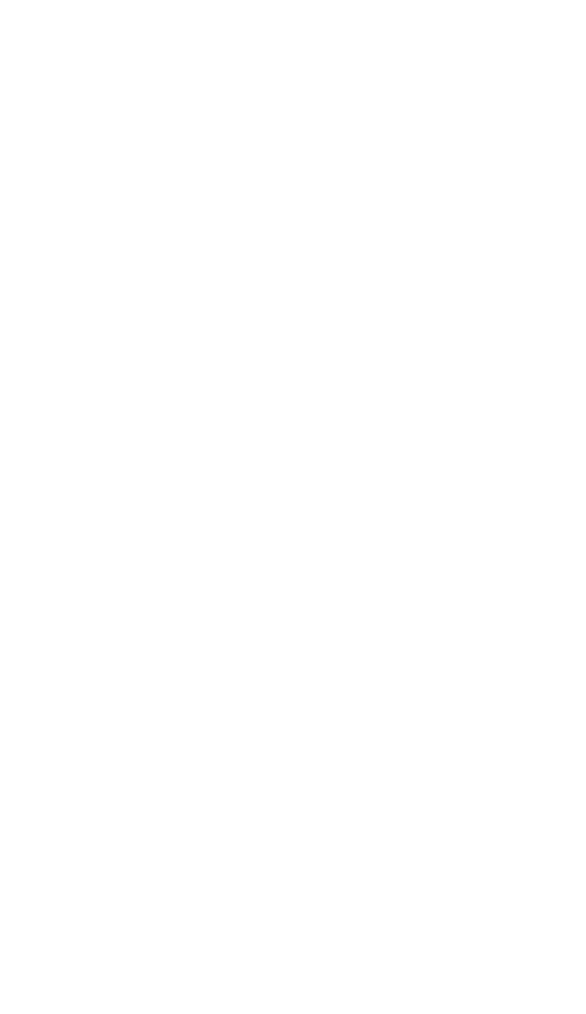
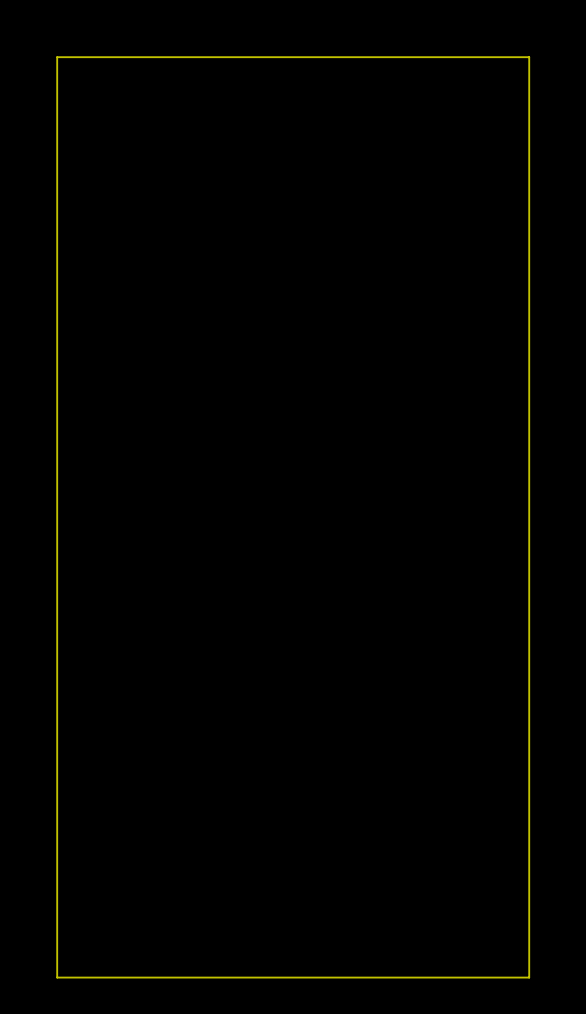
board edge: none -> (57, 57) (529, 57) (529, 977) (57, 977) (57, 57)

